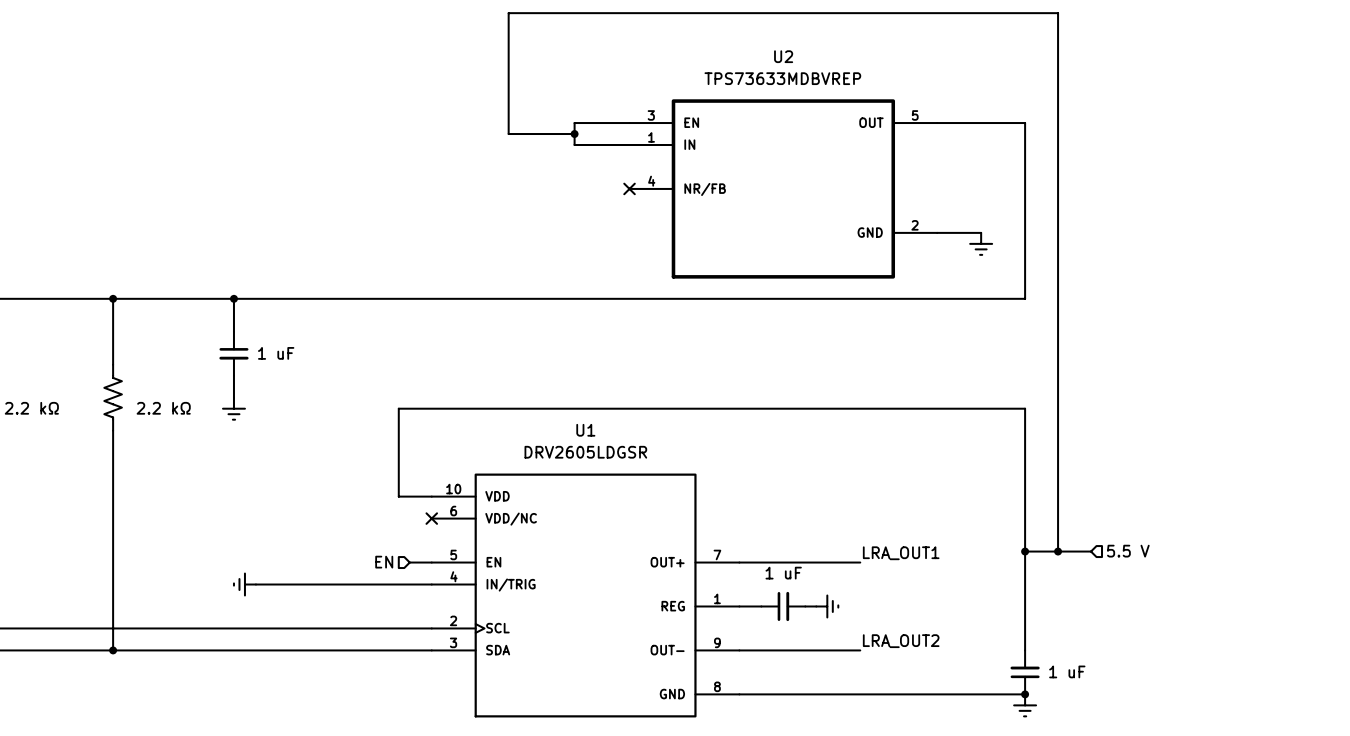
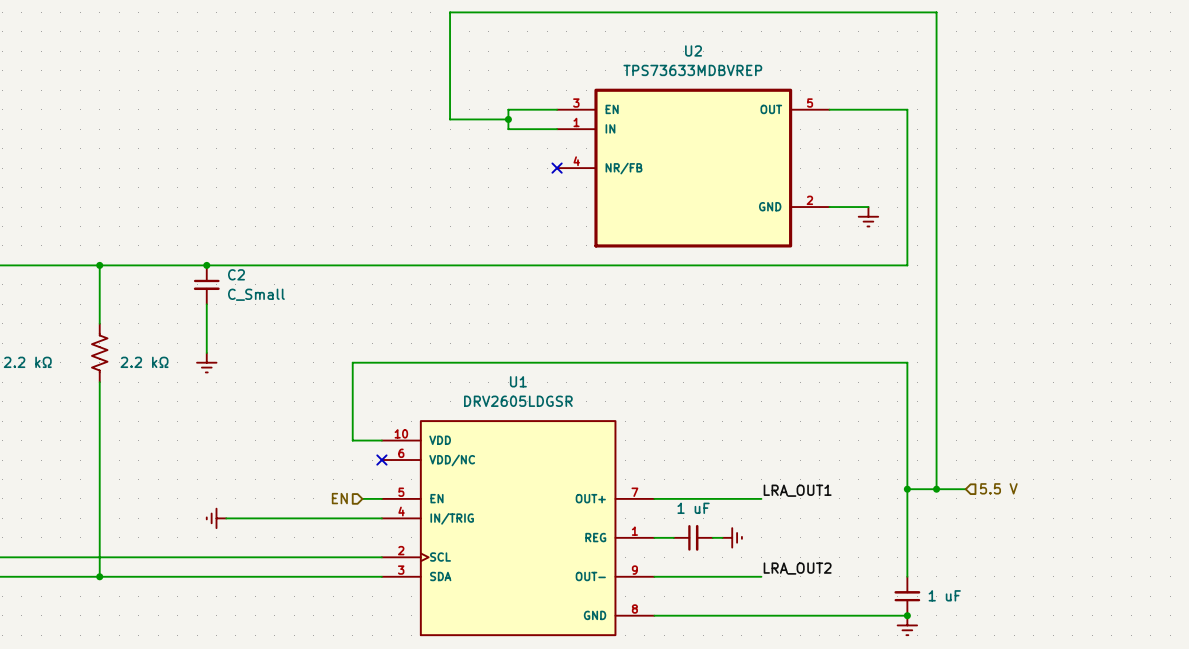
C2: none -> C_Small (206, 284)
part: 1 uF (233, 353) -> none

